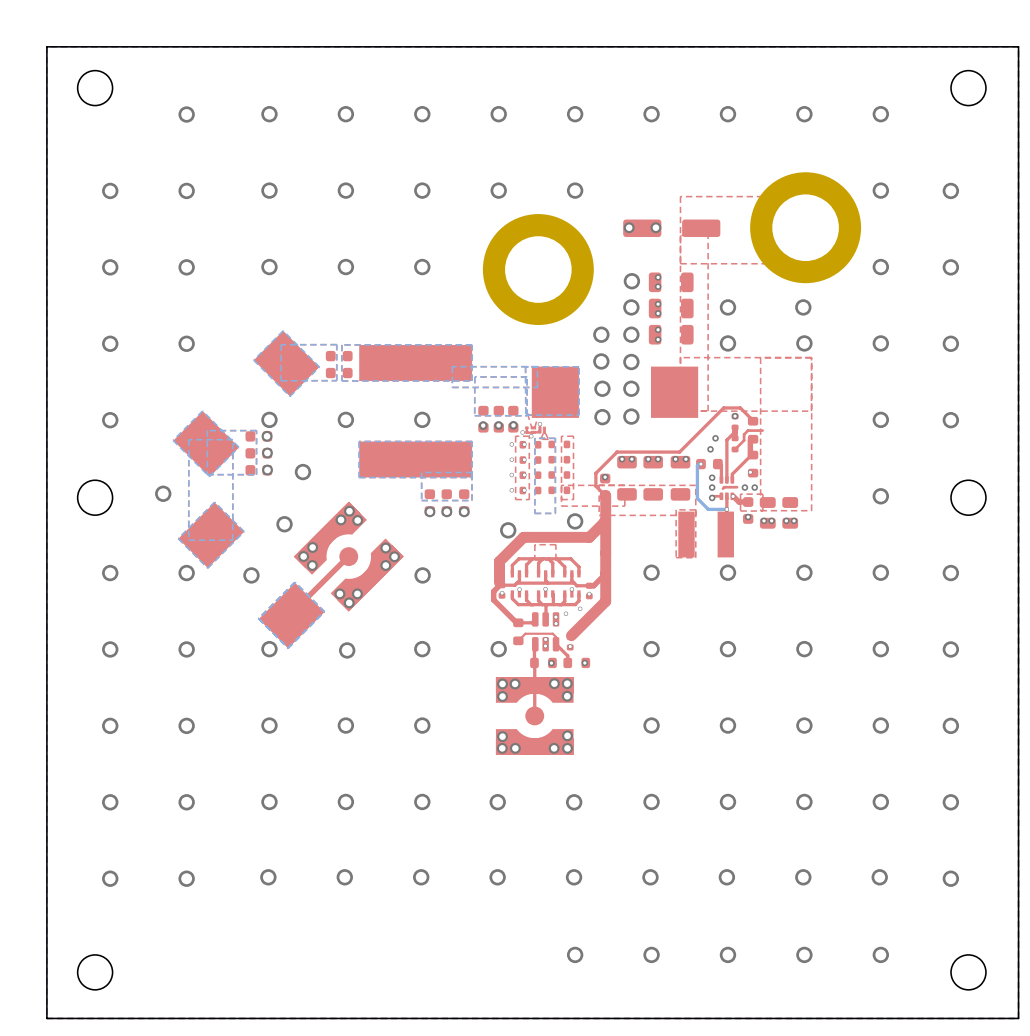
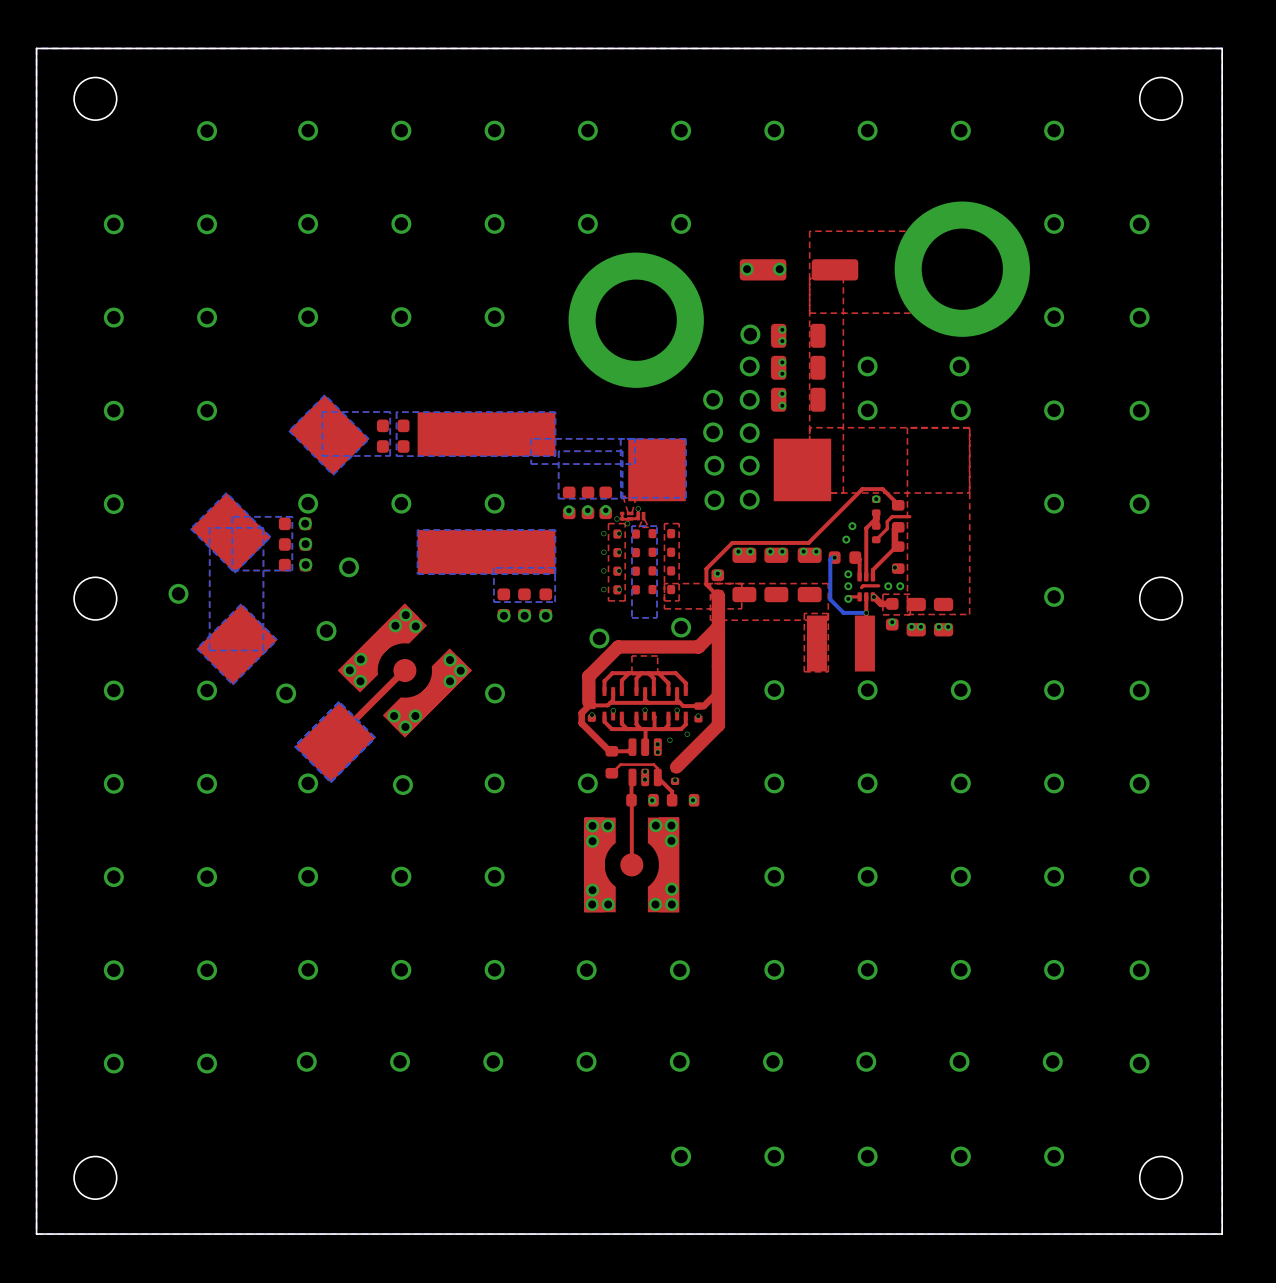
part rotation: 0° (534, 715) -> 90° clockwise (631, 864)

